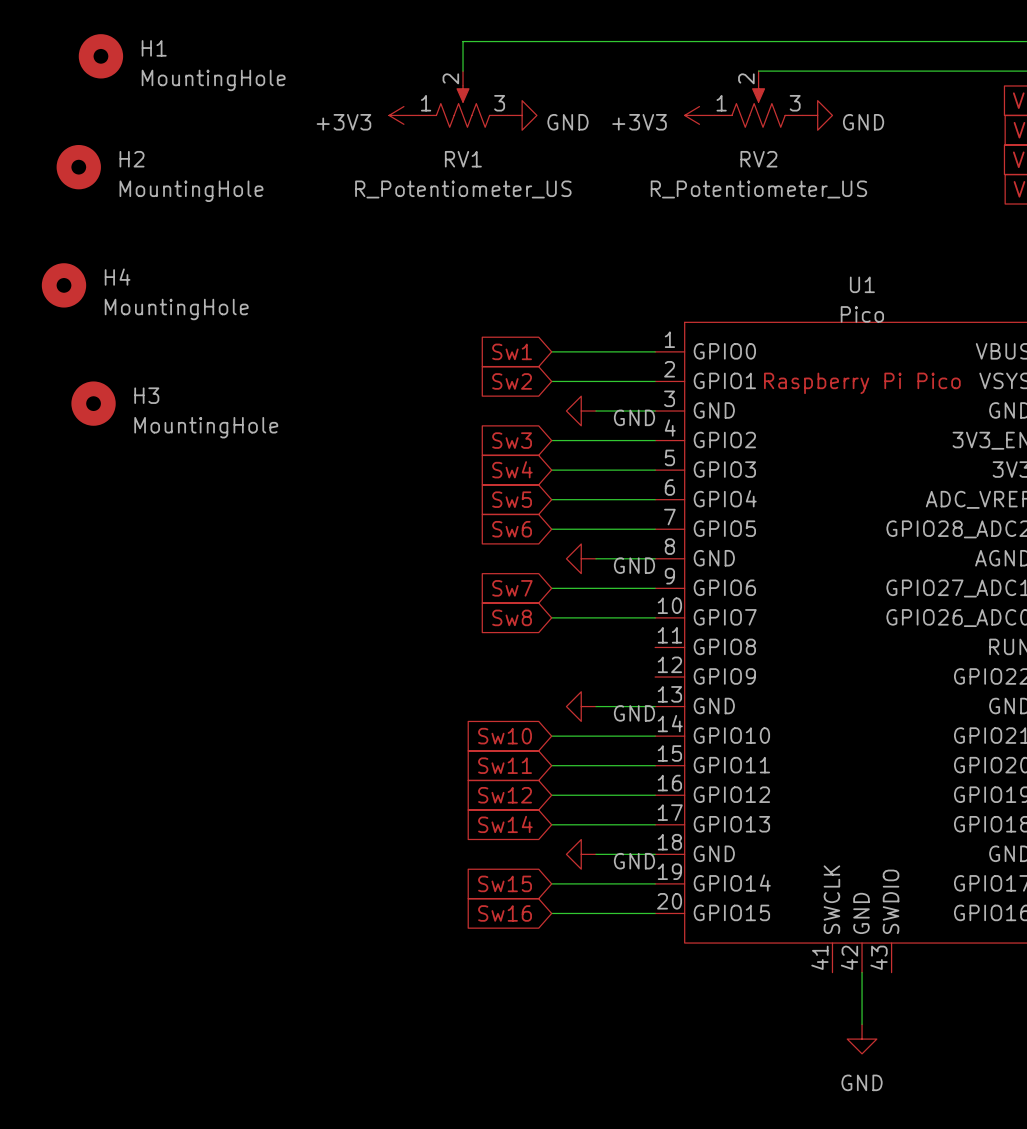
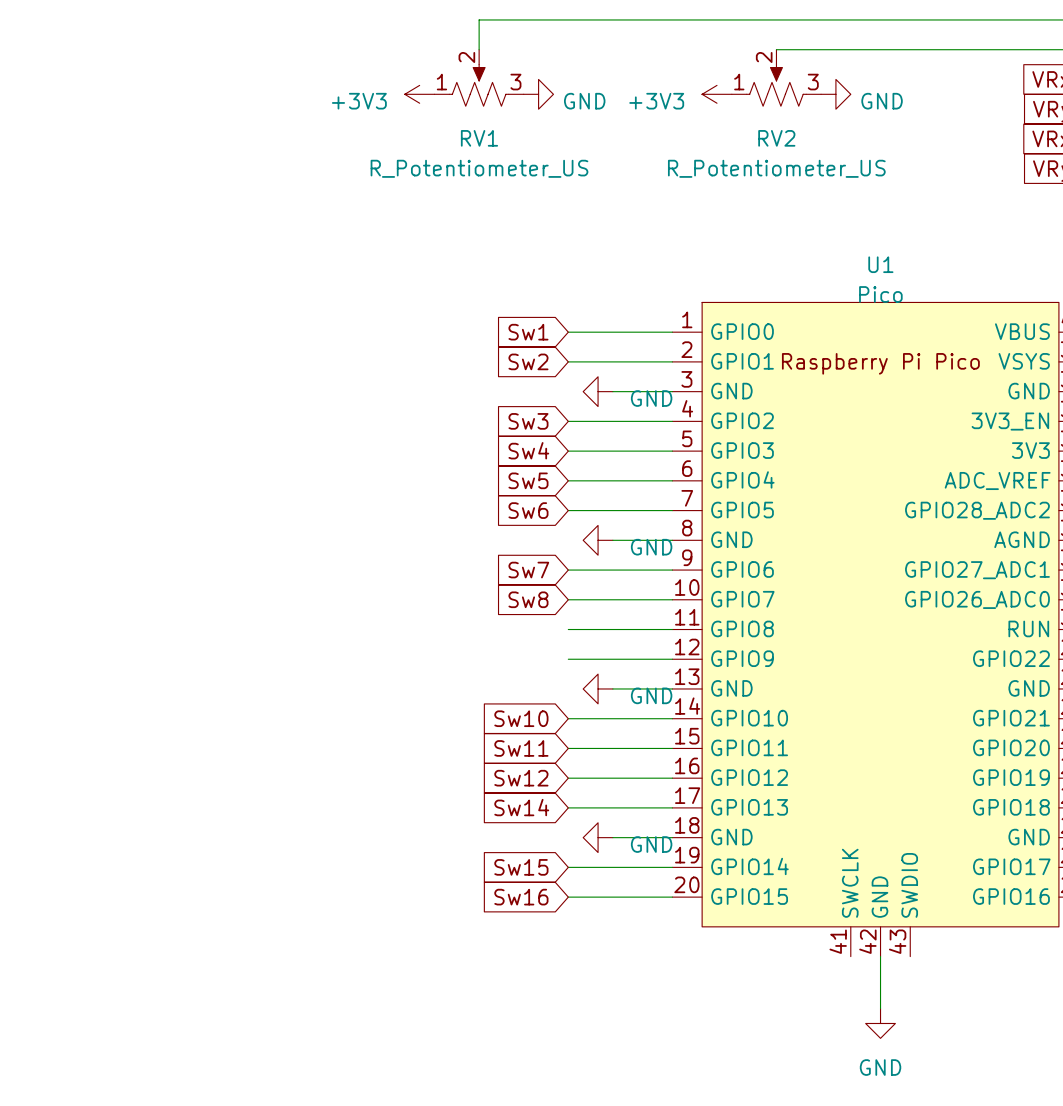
H1: MountingHole (100, 56) -> none
H2: MountingHole (78, 167) -> none
H4: MountingHole (63, 285) -> none
H3: MountingHole (93, 403) -> none
wire: none -> (568, 629) (672, 629)
wire: none -> (568, 659) (672, 659)

